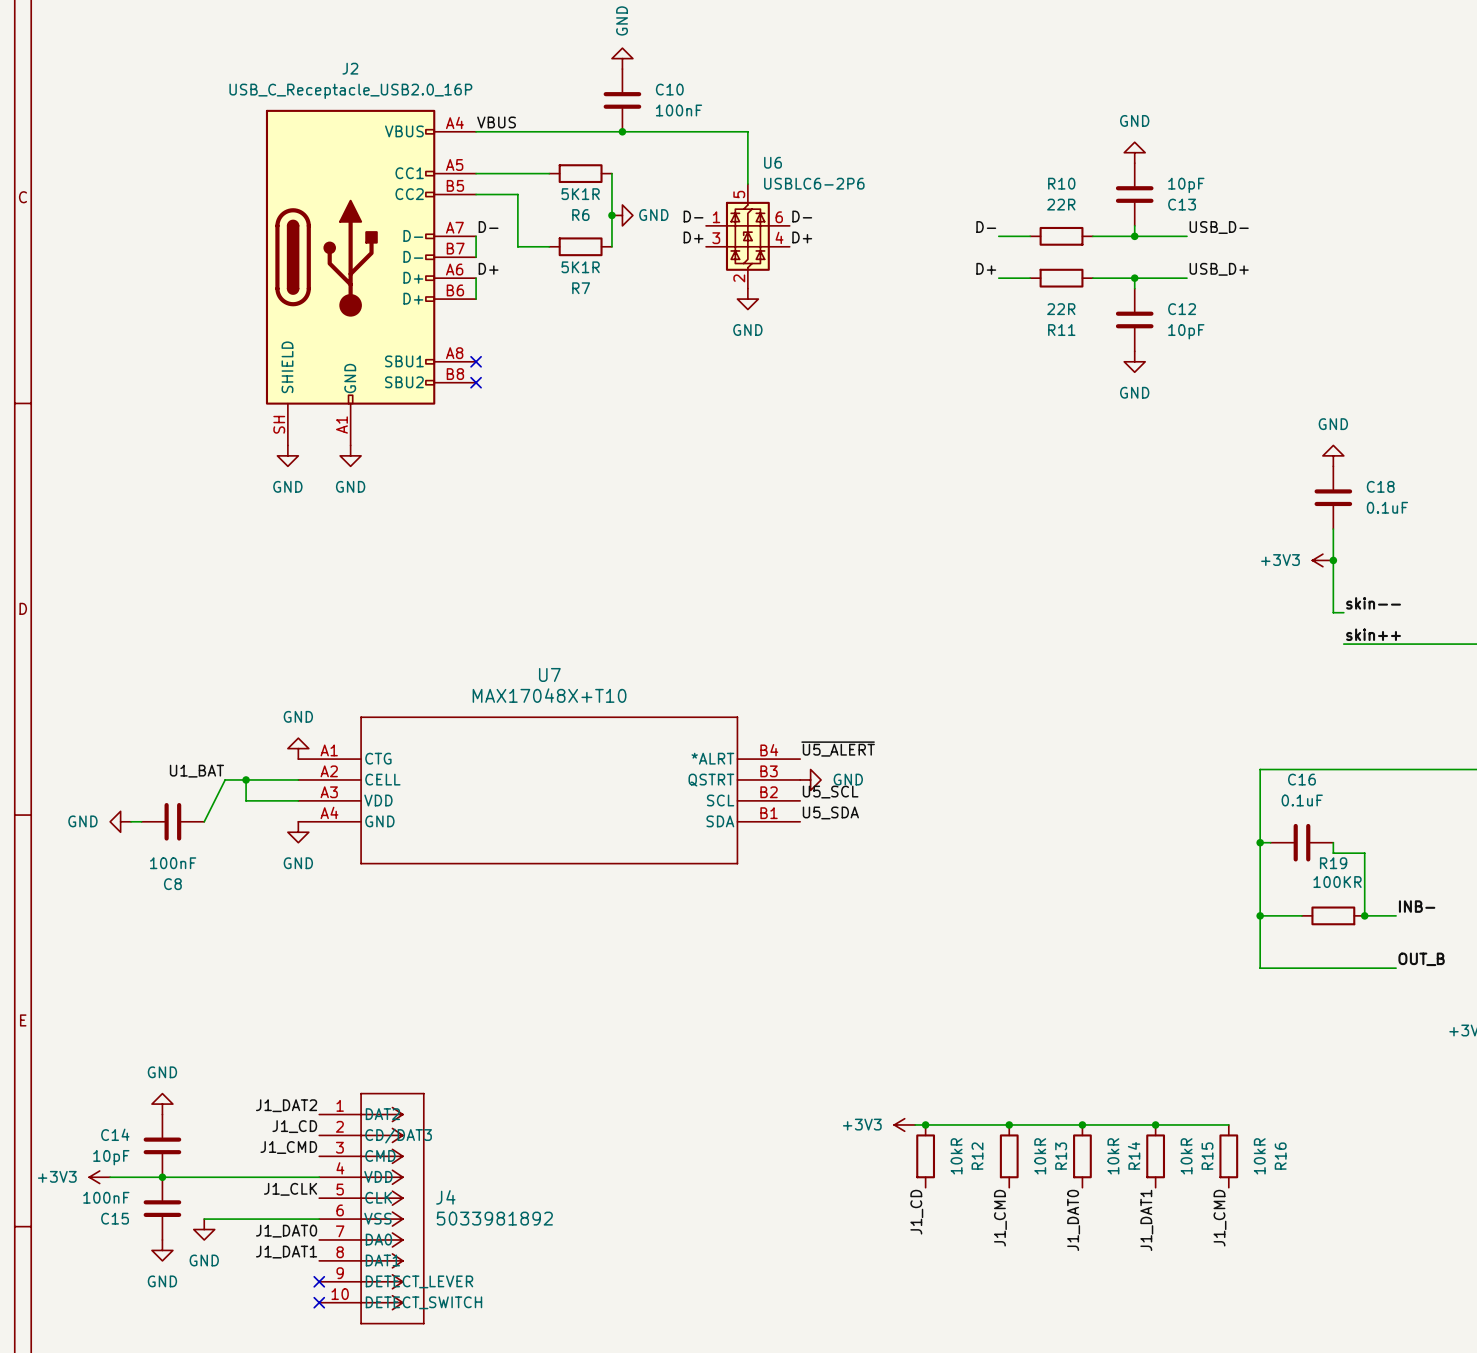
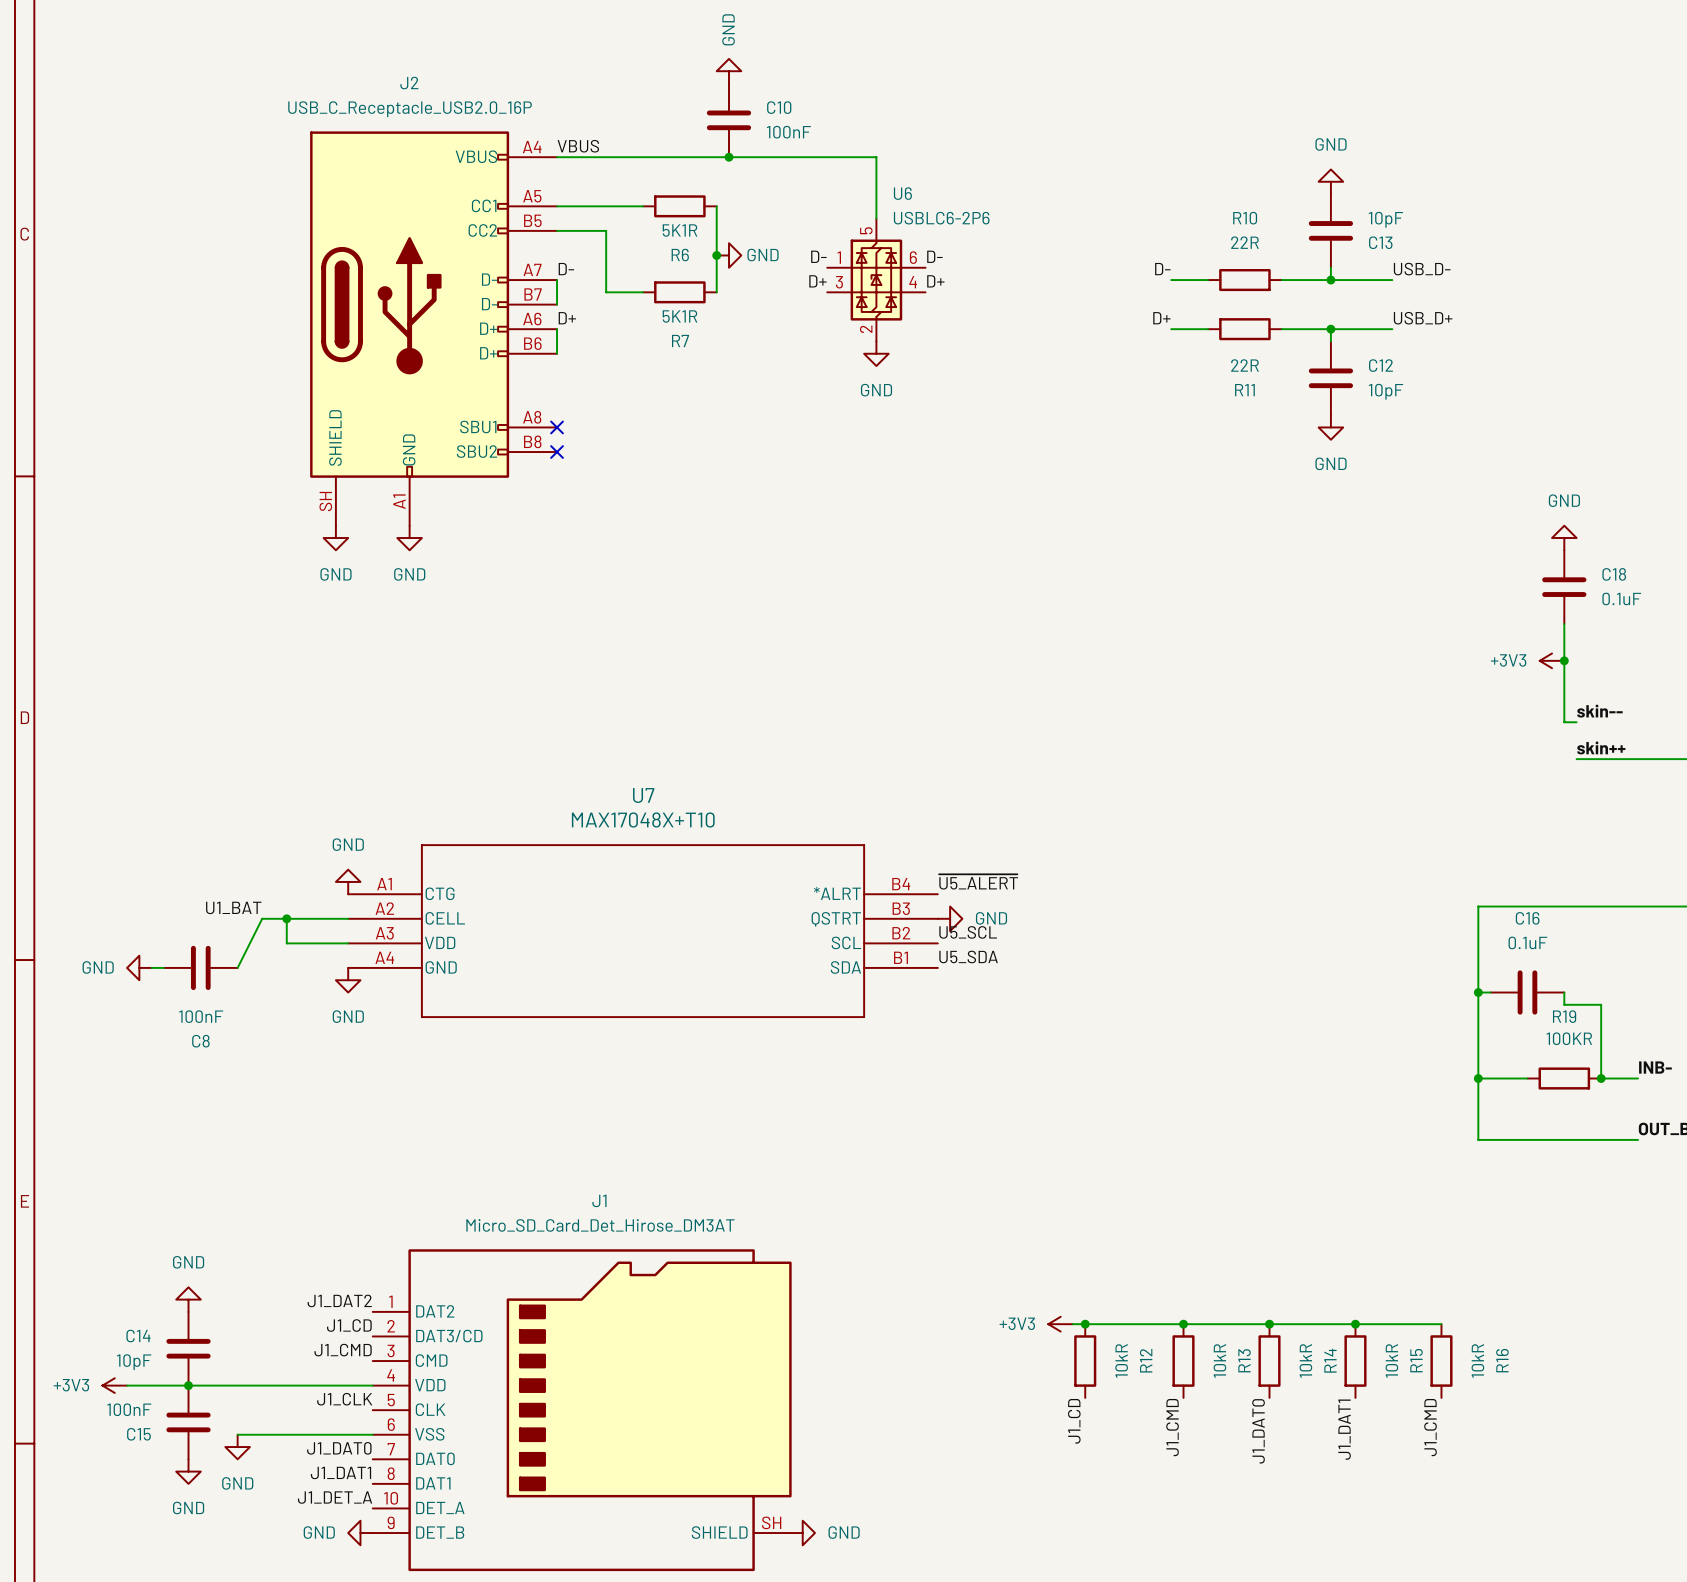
J1: none -> Micro_SD_Card_Det_Hirose_DM3AT (582, 1410)
J4: 5033981892 (371, 1208) -> none
label: none -> J1_DET_A (335, 1497)
no-connect mark: (319, 1281) -> none
power symbol: none -> GND (360, 1533)
no-connect mark: (319, 1302) -> none
power symbol: none -> GND (802, 1533)

